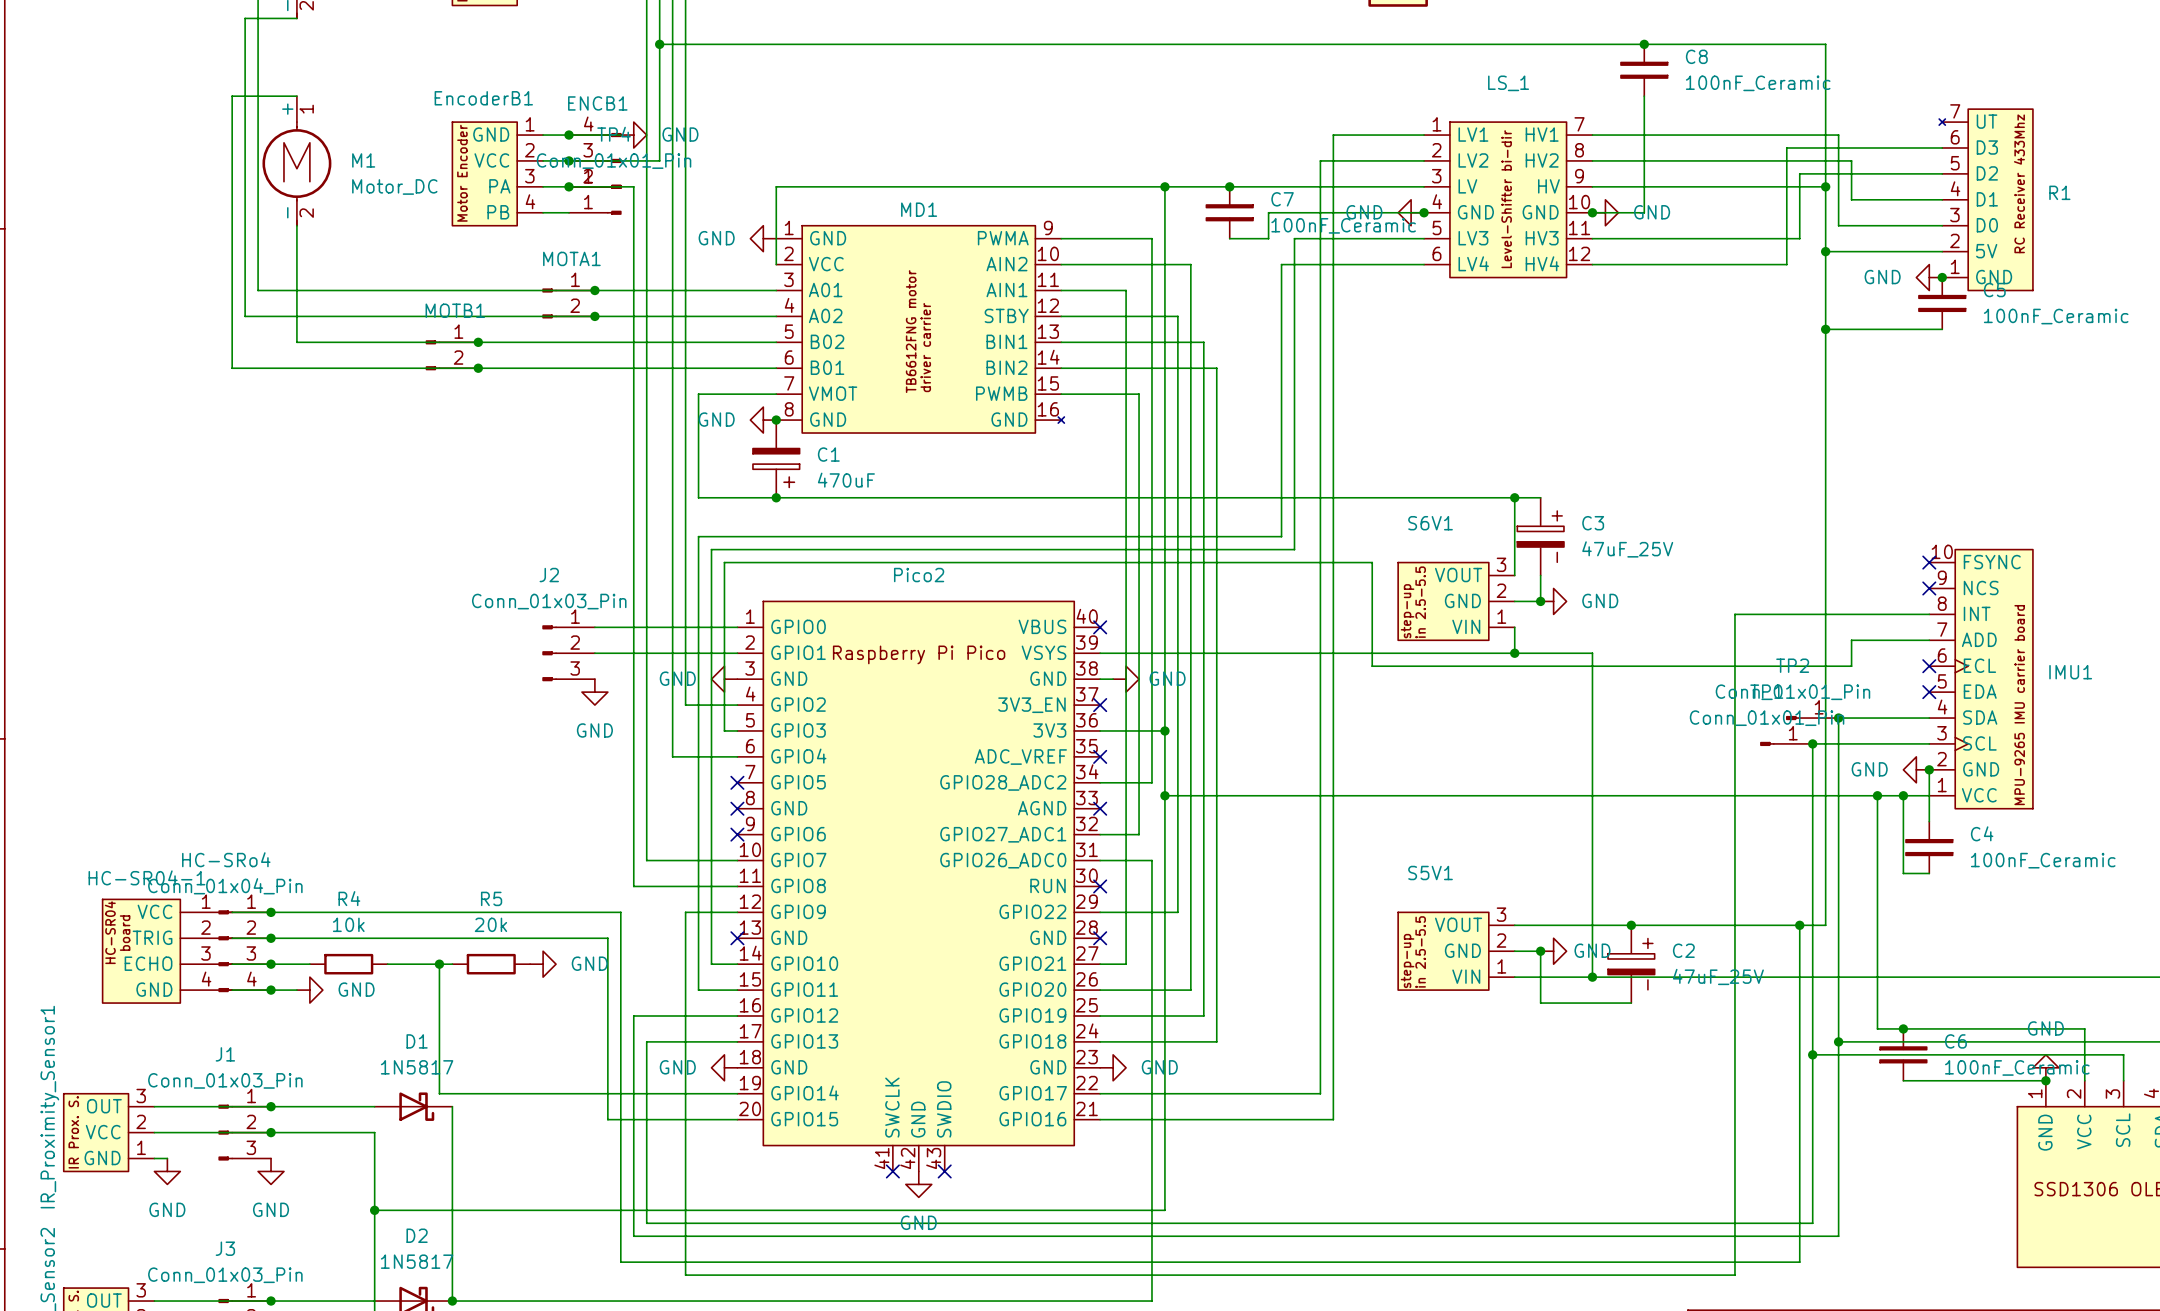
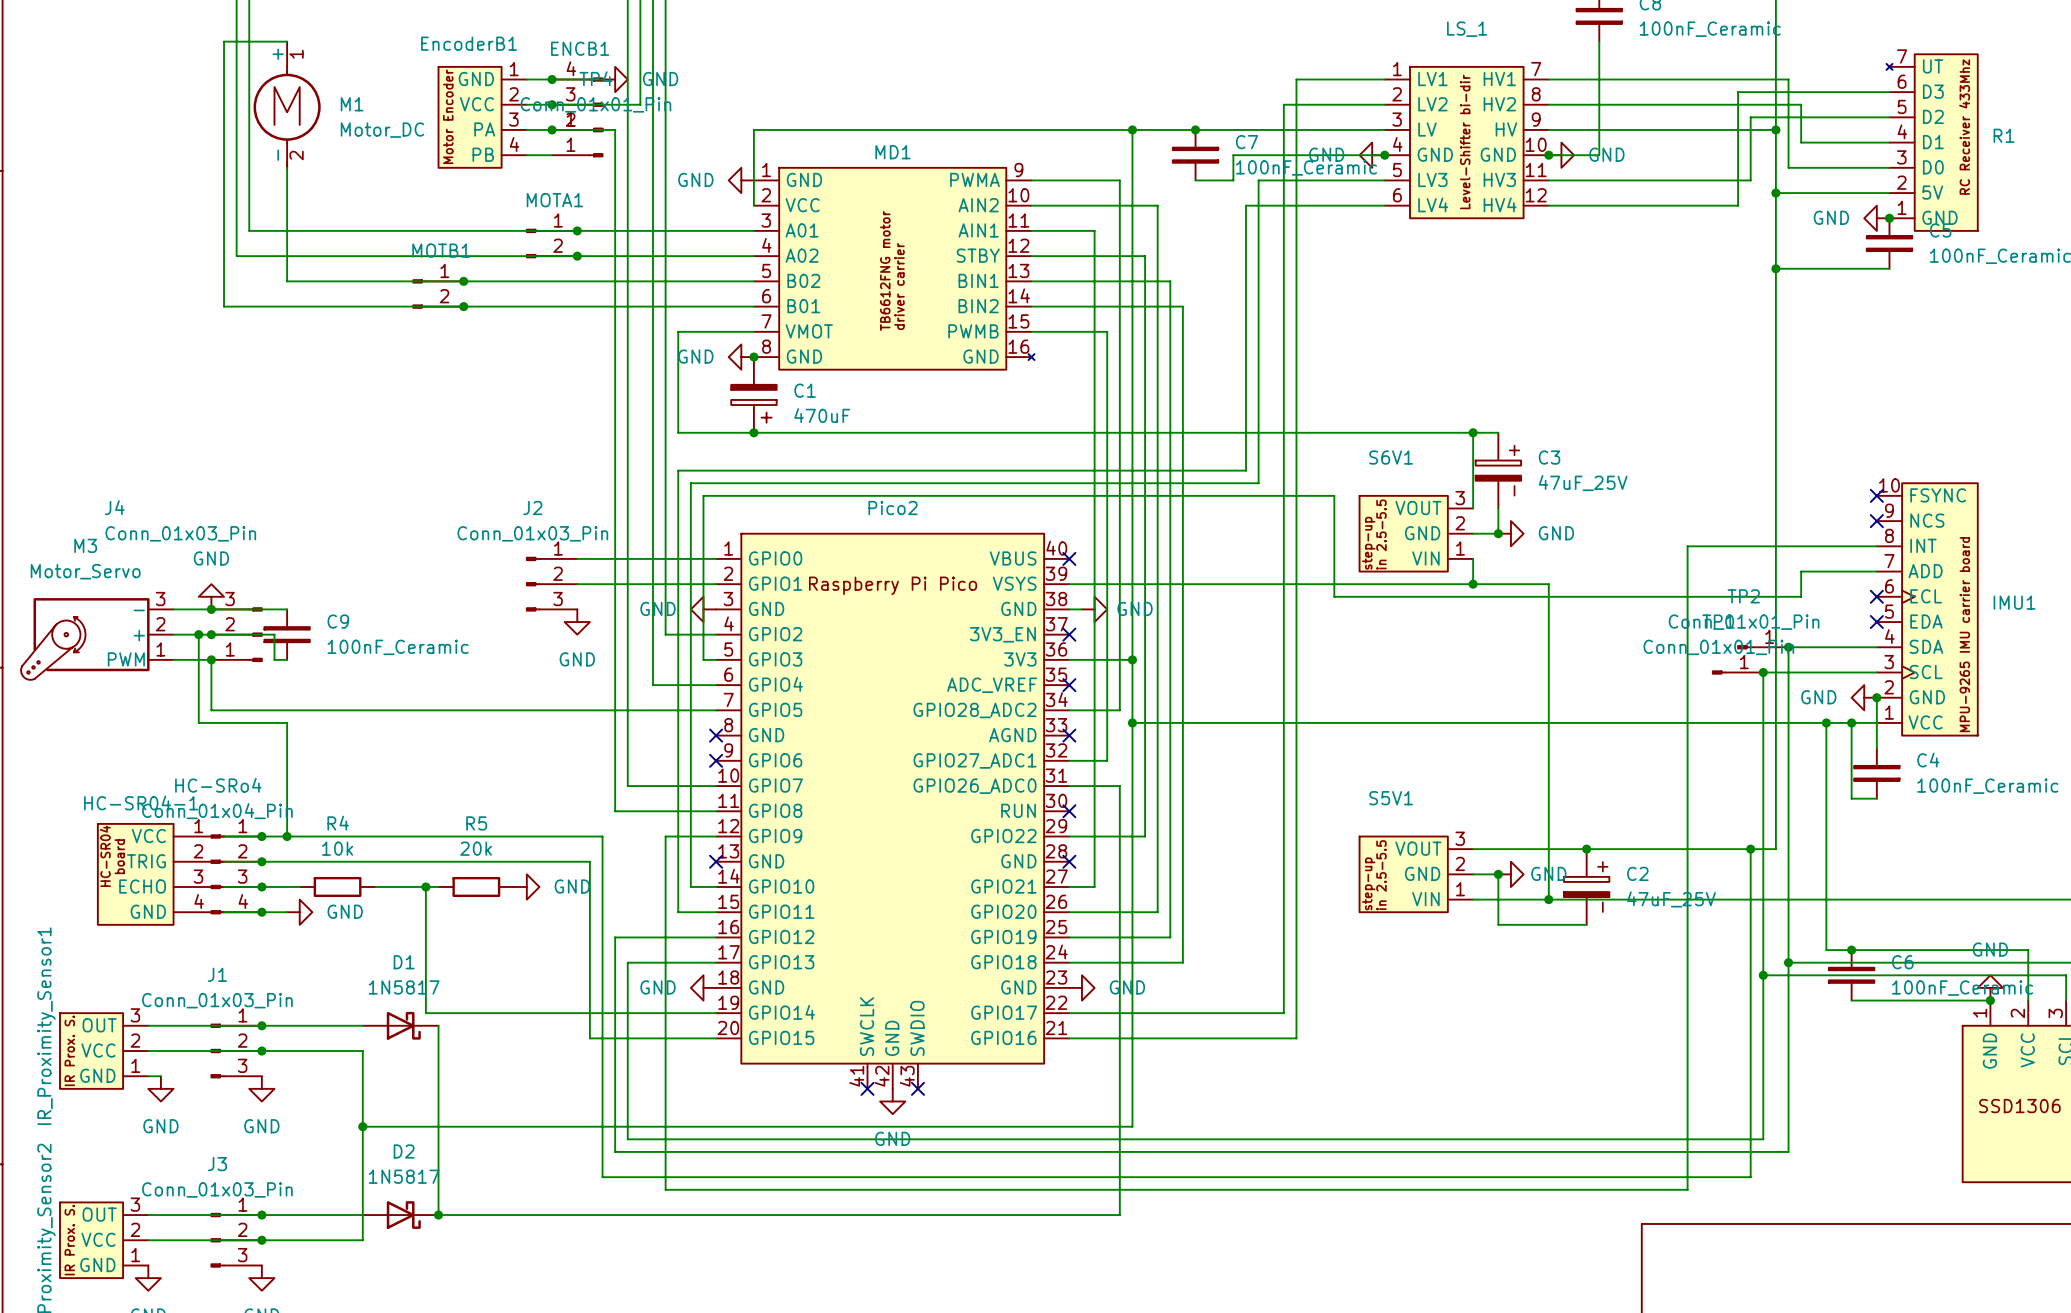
power symbol: none -> GND (211, 596)
wire: none -> (173, 609) (287, 609)
junction: none -> (211, 609)
wire: none -> (173, 634) (274, 634) (274, 659) (287, 659)
wire: none -> (198, 634) (198, 722) (287, 722) (287, 836)
junction: none -> (198, 634)
junction: none -> (211, 634)
J4: none -> Conn_01x03_Pin (237, 634)
C9: none -> 100nF_Ceramic (287, 634)
M3: none -> Motor_Servo (97, 638)
wire: none -> (173, 659) (211, 659) (211, 710) (716, 710)
junction: none -> (211, 659)
no-connect mark: (737, 782) -> none
junction: none -> (287, 836)

